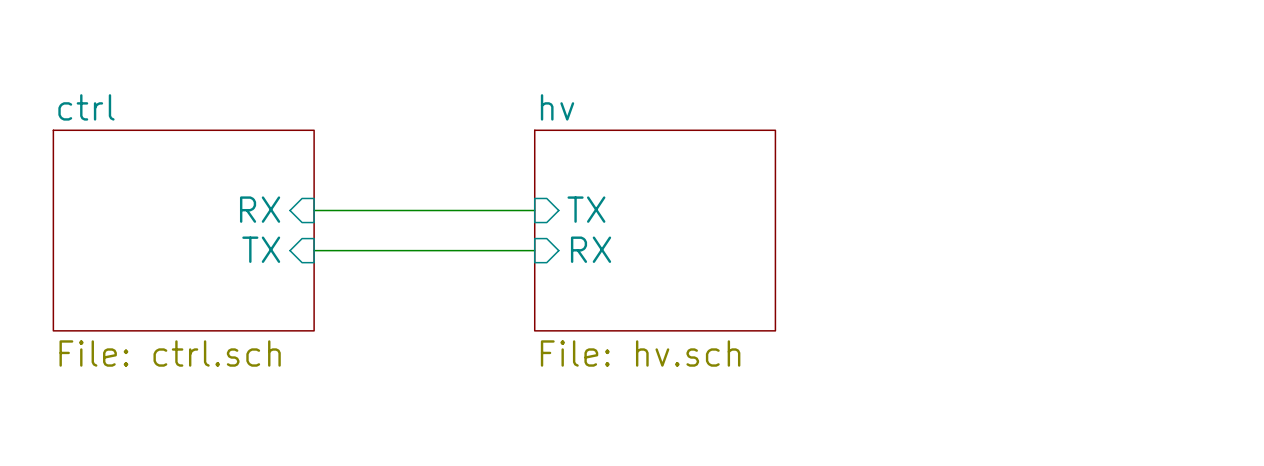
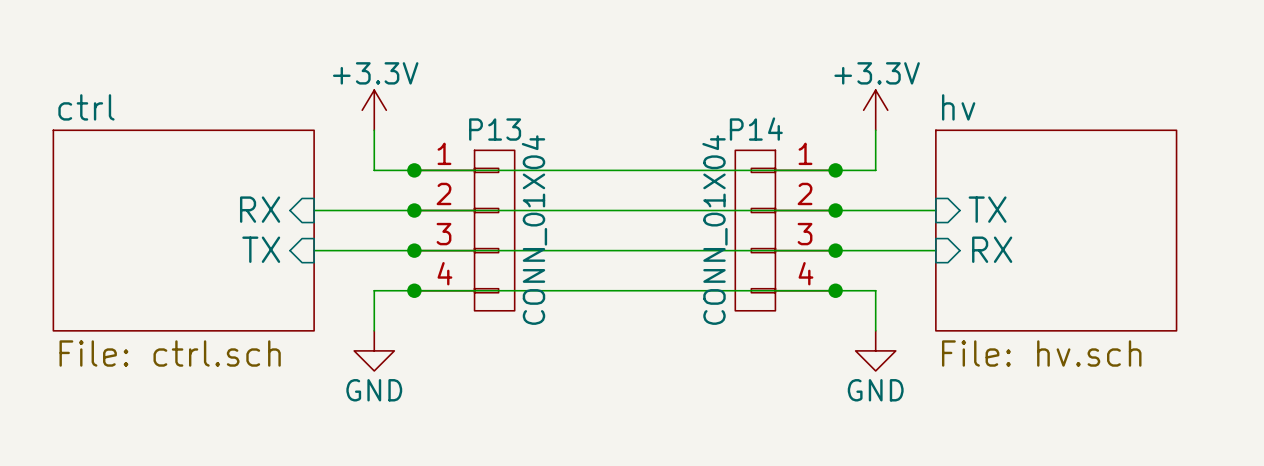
power symbol: none -> +3.3V (374, 110)
power symbol: none -> +3.3V (875, 110)
wire: none -> (374, 130) (374, 170) (875, 170) (875, 130)
junction: none -> (414, 170)
junction: none -> (835, 170)
sheet pin: TX (586, 209) -> none
sheet pin: none -> TX (987, 209)
junction: none -> (414, 210)
wire: none -> (534, 210) (935, 210)
junction: none -> (835, 210)
P13: none -> CONN_01X04 (464, 230)
sheet hv: File: hv.sch (655, 230) -> none
P14: none -> CONN_01X04 (785, 230)
sheet hv: none -> File: hv.sch (1056, 230)
sheet pin: RX (591, 249) -> none
sheet pin: none -> RX (992, 249)
junction: none -> (414, 250)
wire: none -> (534, 250) (935, 250)
junction: none -> (835, 250)
junction: none -> (414, 290)
junction: none -> (835, 290)
wire: none -> (374, 330) (374, 290) (875, 290) (875, 330)
power symbol: none -> GND (374, 350)
power symbol: none -> GND (875, 350)

